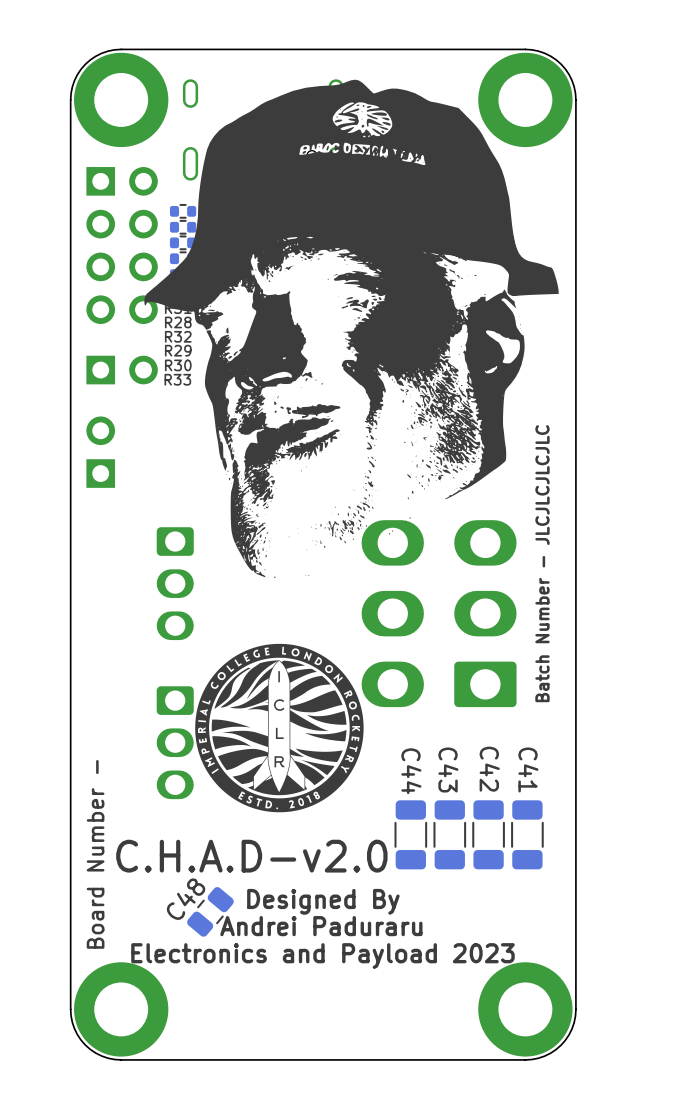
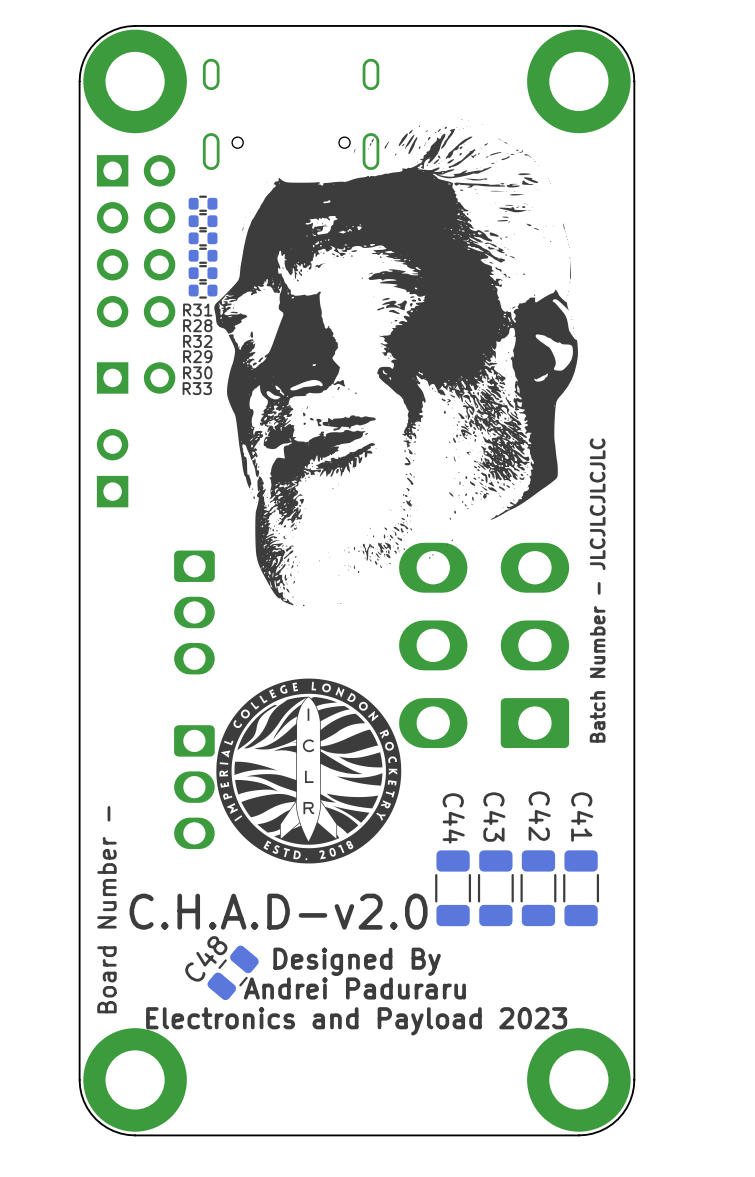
part: (351, 195) -> none

